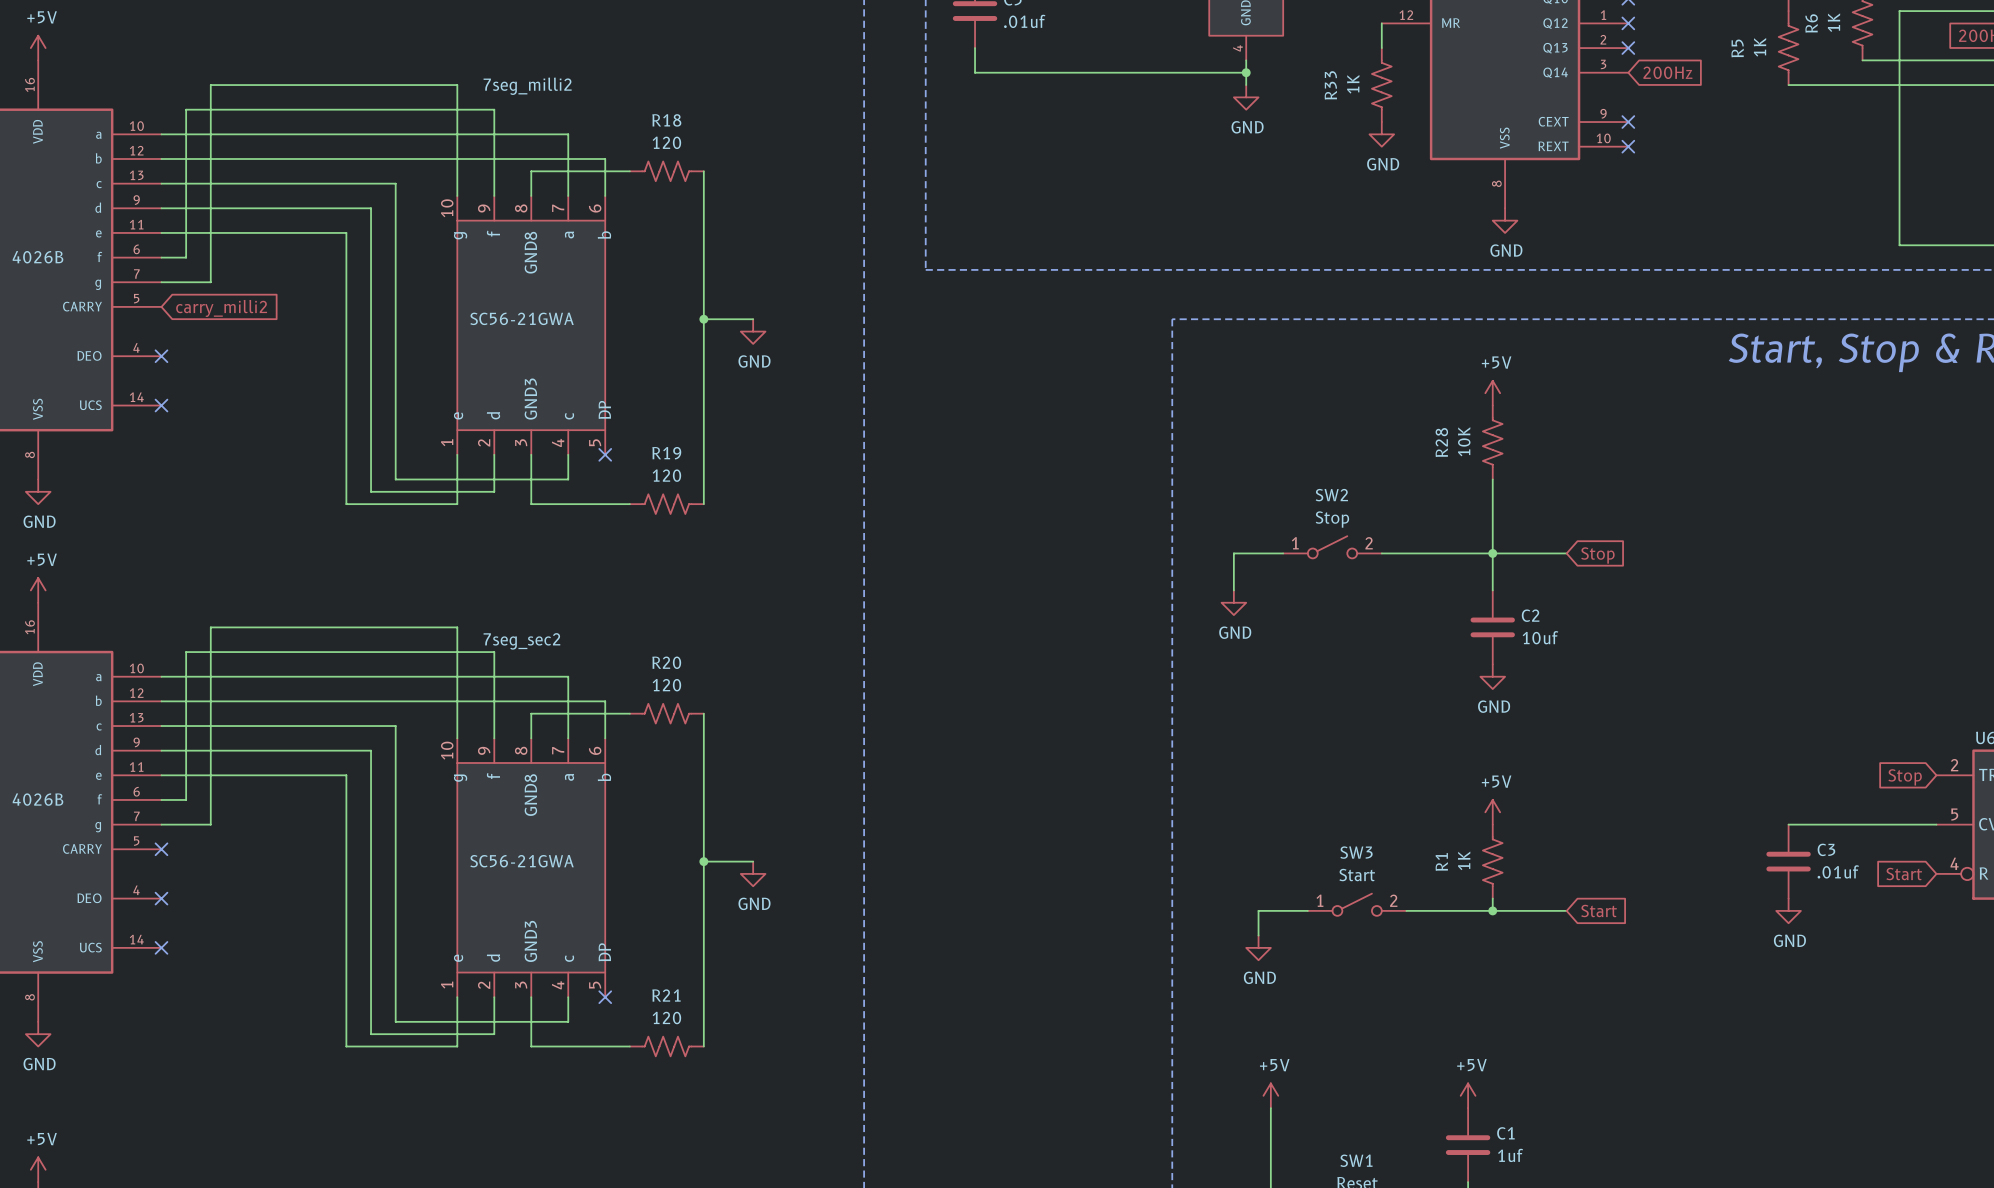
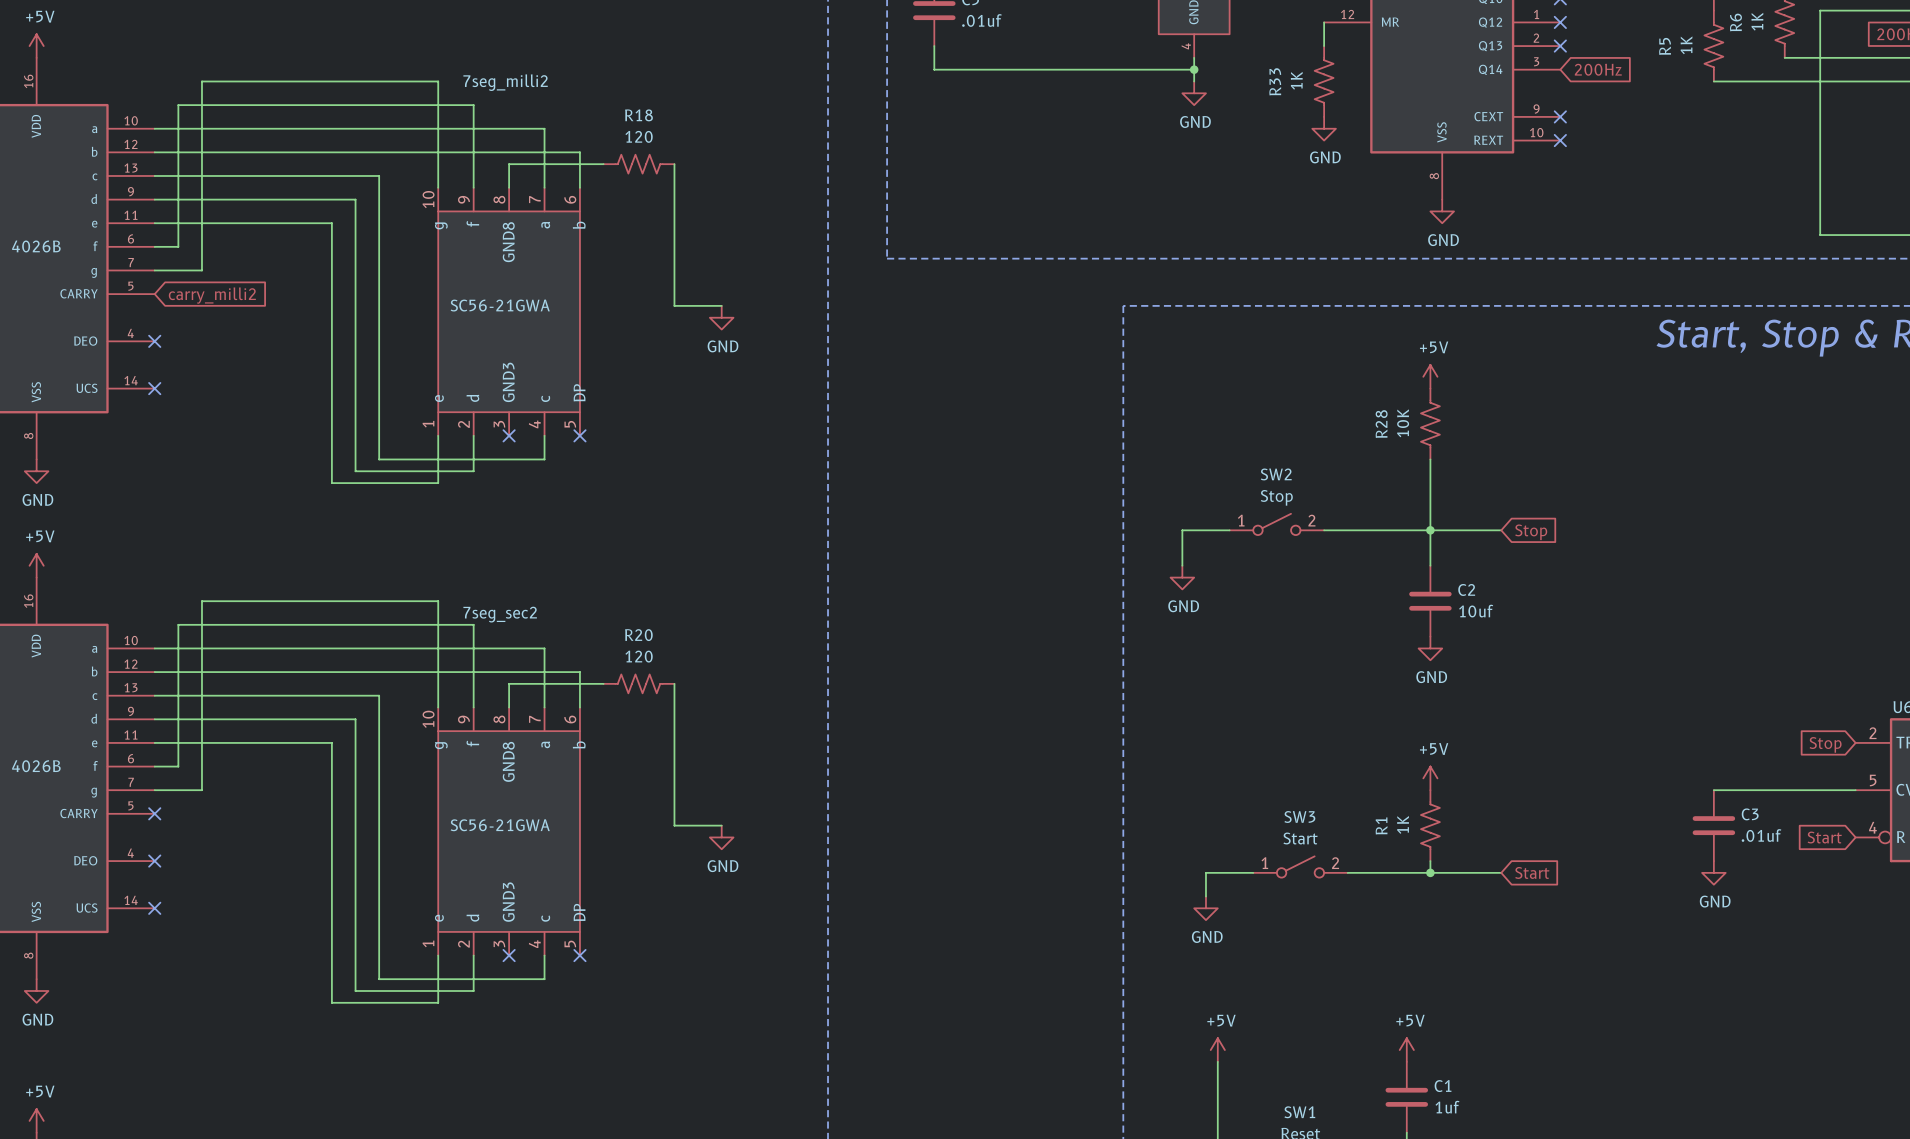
wire: (703, 319) (703, 504) -> none
junction: (703, 319) -> none
wire: (531, 454) (531, 504) (629, 504) -> none
no-connect mark: none -> (509, 435)
R19: 120 (666, 504) -> none
wire: (703, 861) (703, 1046) -> none
junction: (703, 861) -> none
wire: (531, 997) (531, 1046) (629, 1046) -> none
no-connect mark: none -> (509, 955)
R21: 120 (666, 1046) -> none

